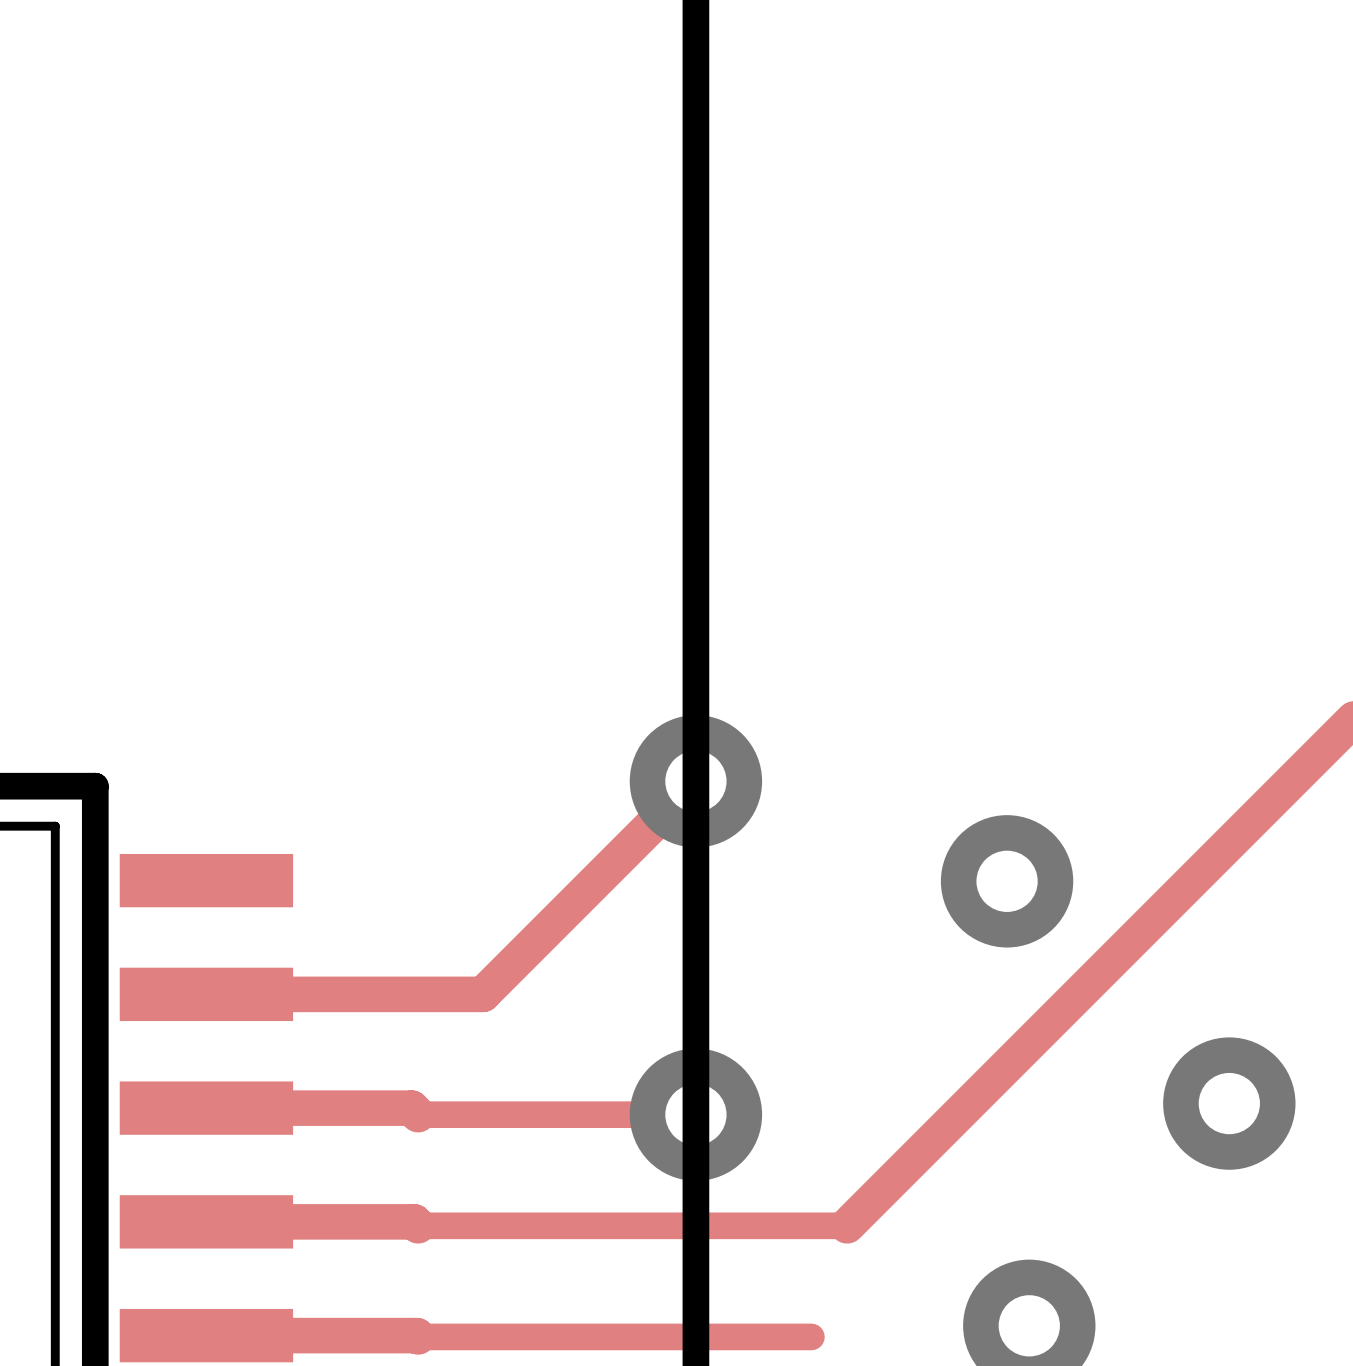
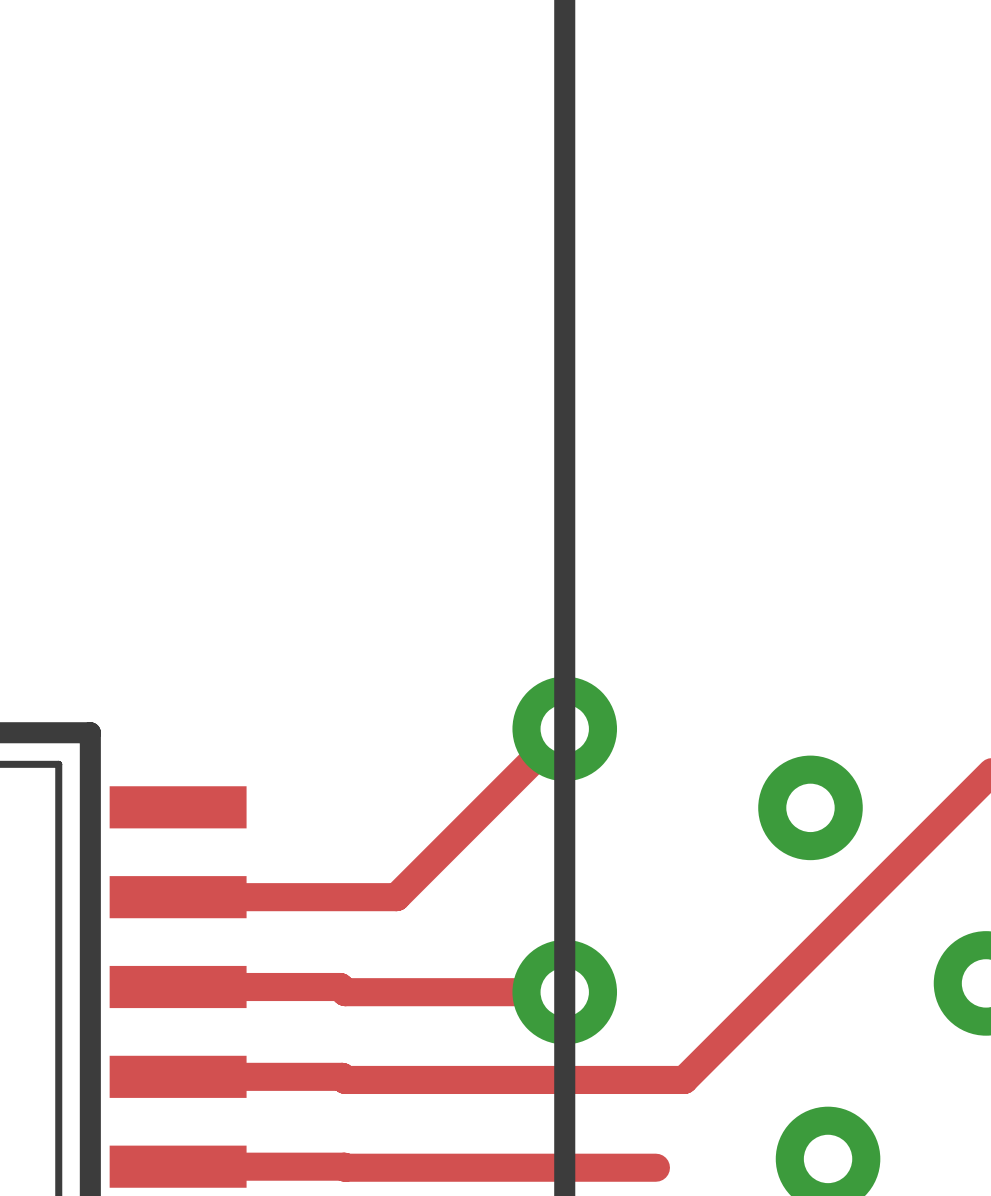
track width: thin (418, 1114) (695, 1114) -> thick (345, 992) (564, 992)
track width: thin (418, 1225) (847, 1225) -> thick (345, 1079) (684, 1079)
track width: thin (418, 1336) (811, 1336) -> thick (345, 1167) (655, 1167)

